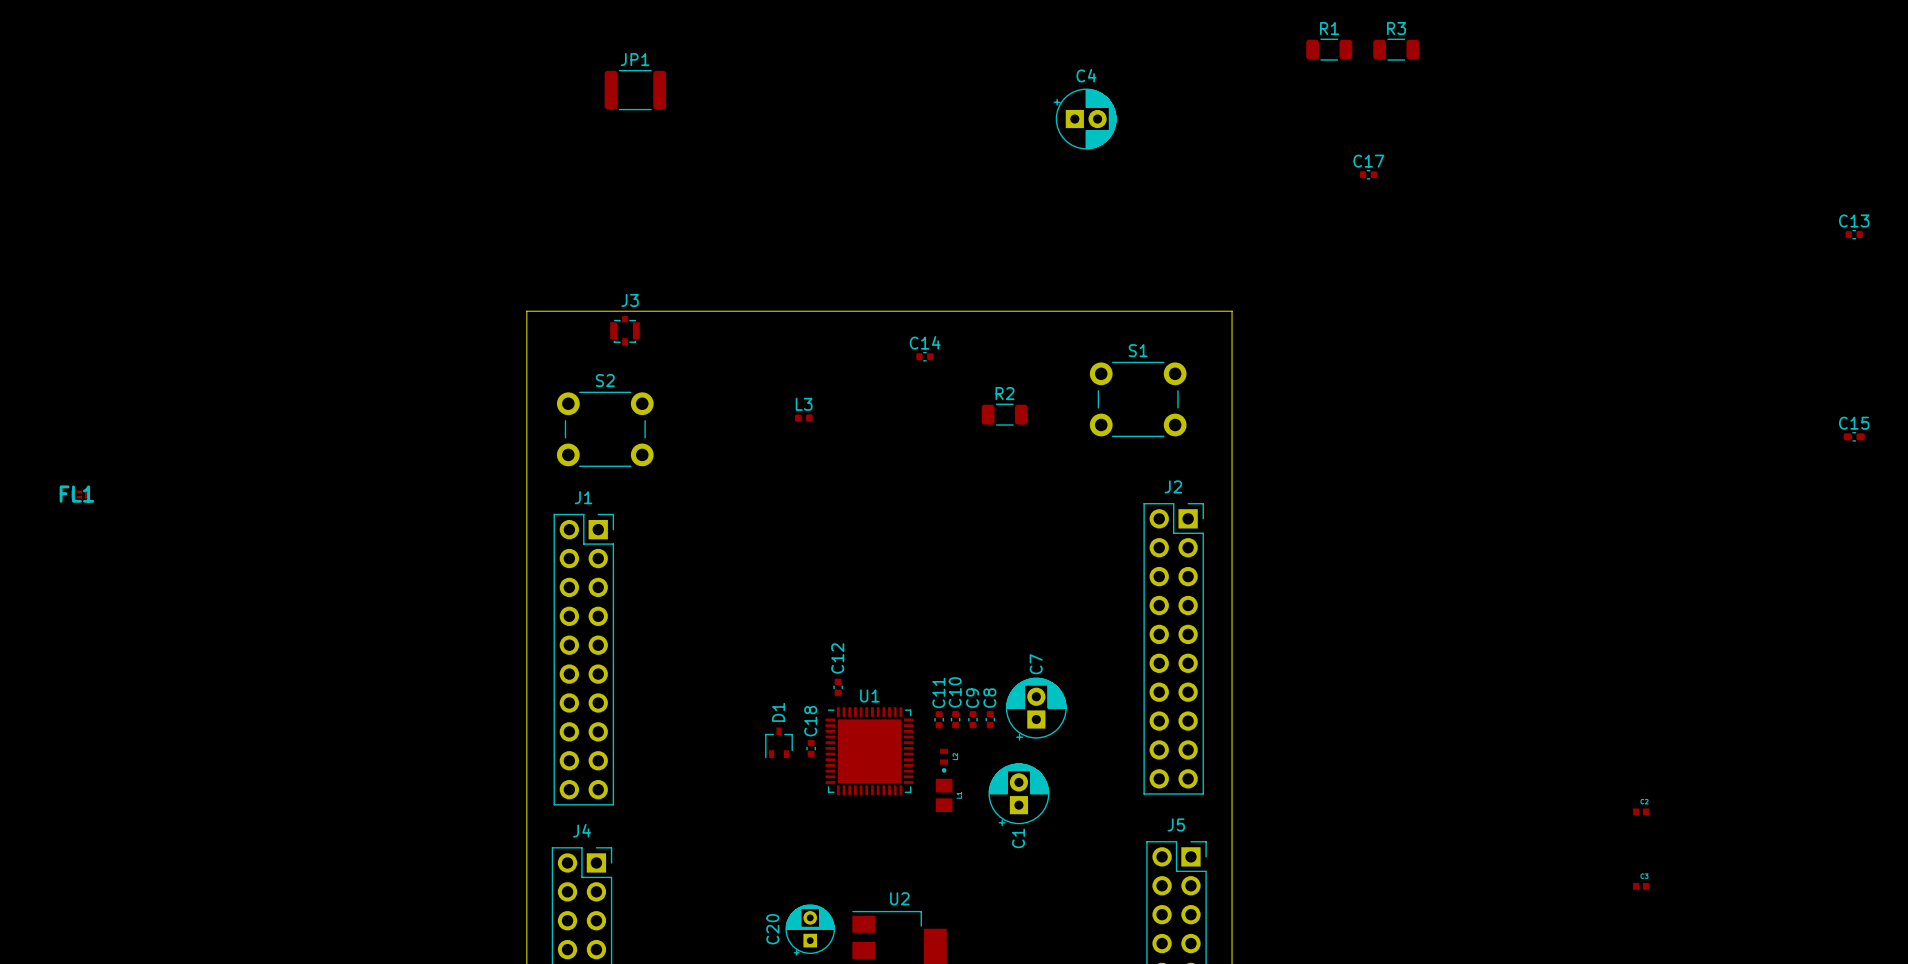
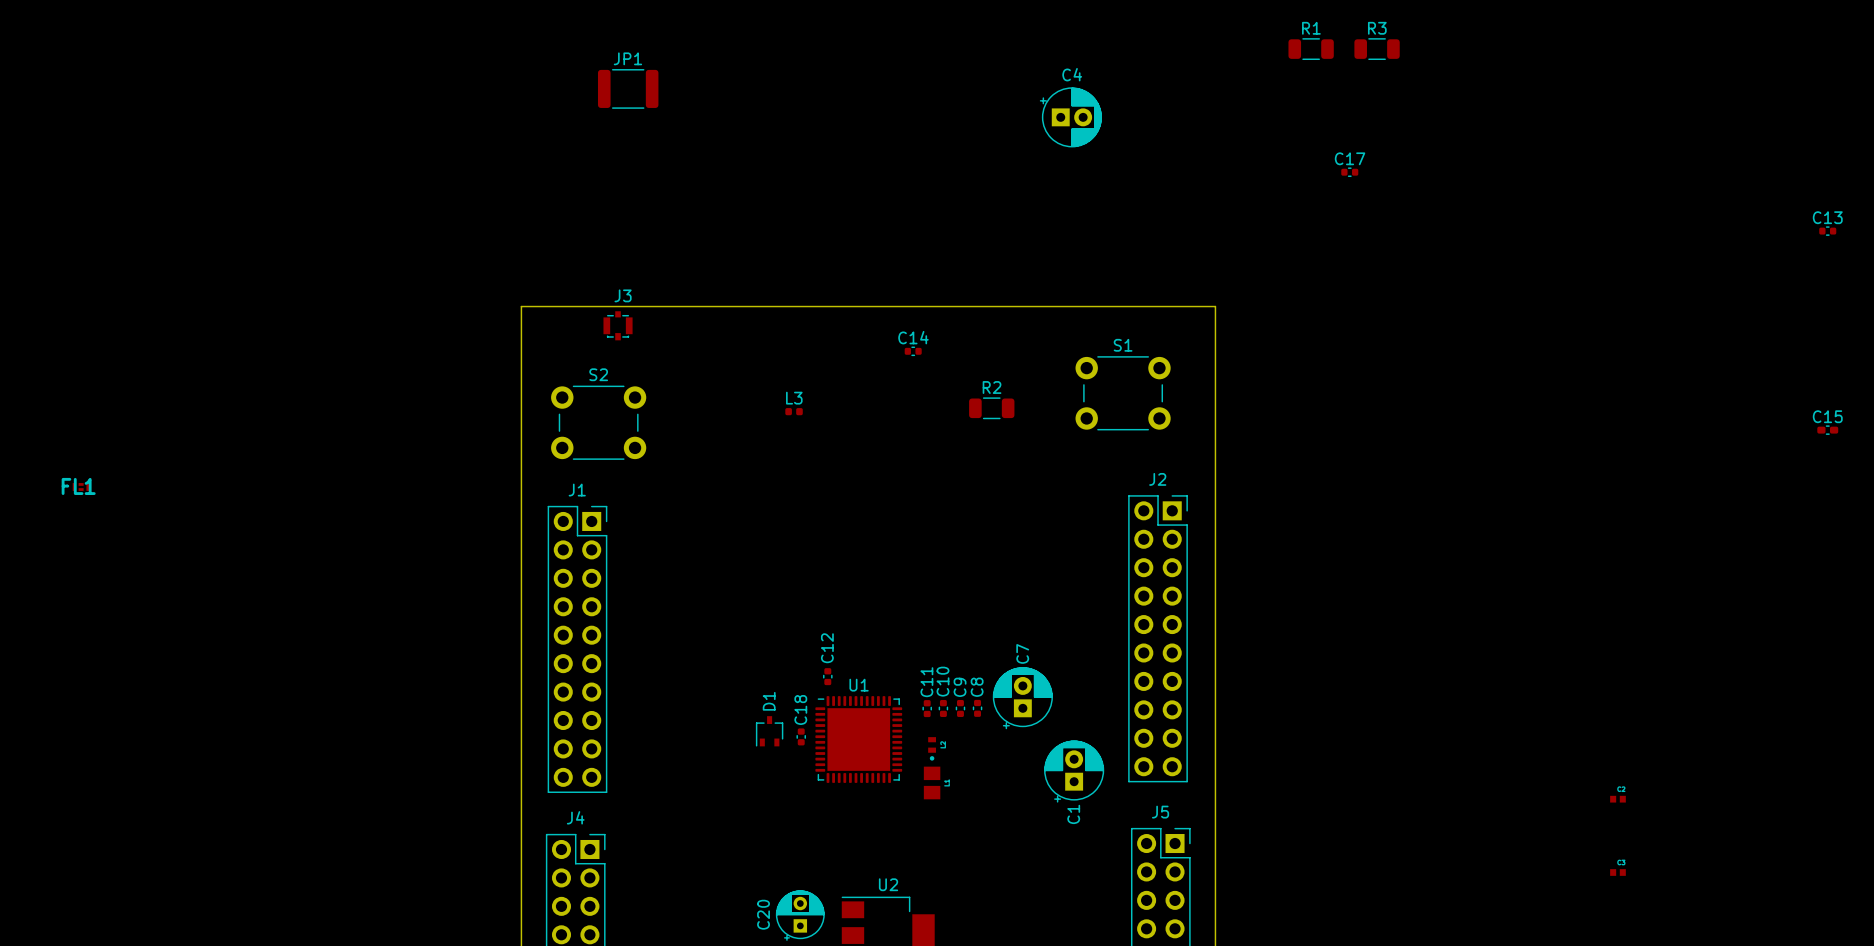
C1 position: (1018, 794) -> (1074, 771)

